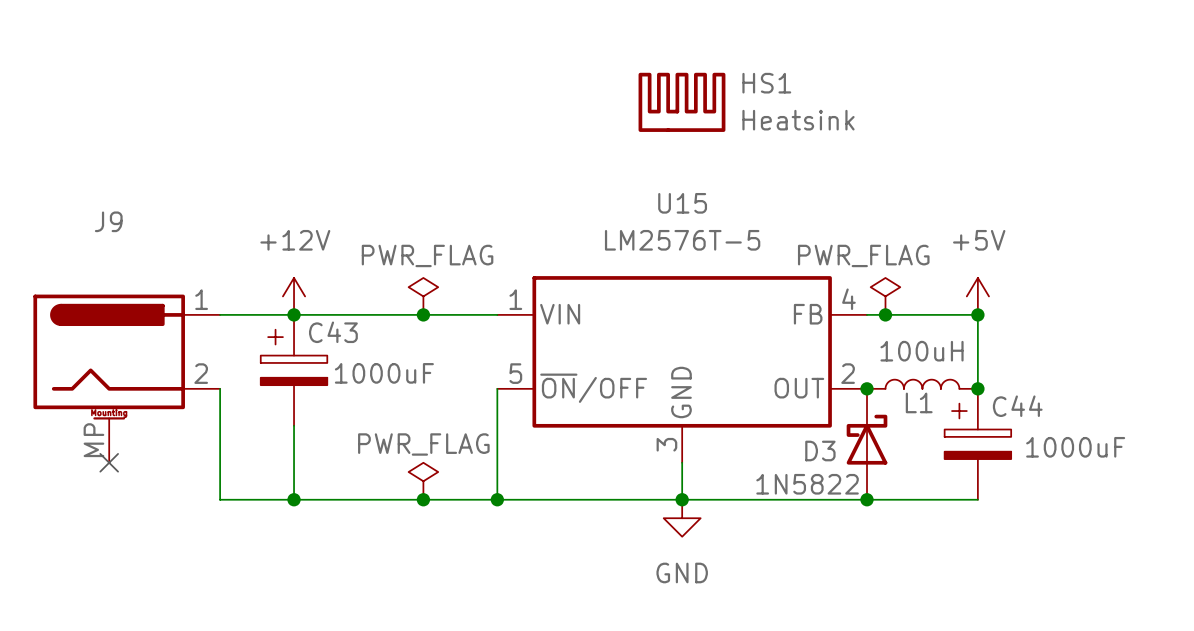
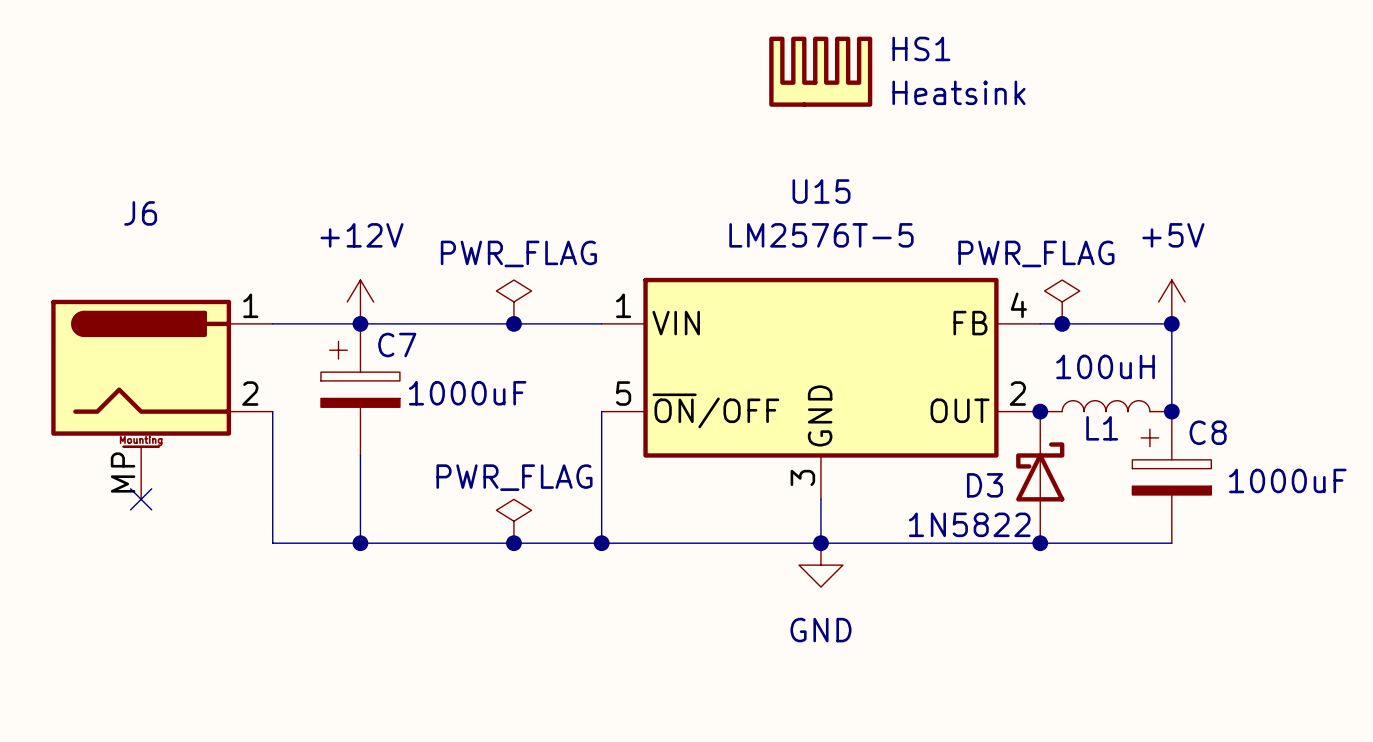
J9 name: J9 (108, 221) -> J6 (140, 213)
C43 name: C43 (333, 332) -> C7 (397, 345)
C44 name: C44 (1017, 406) -> C8 (1208, 432)

